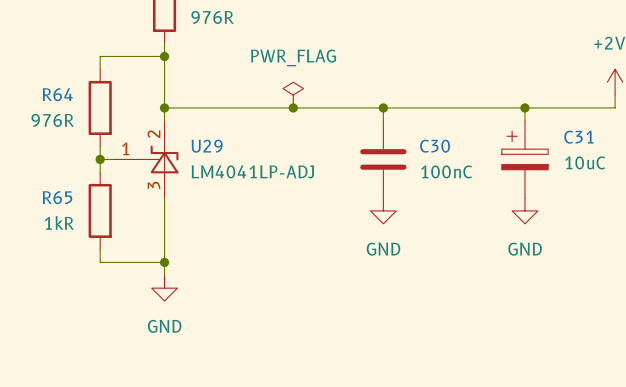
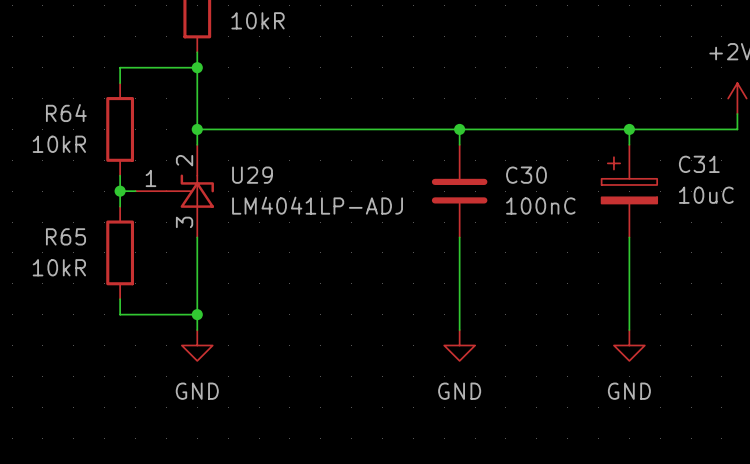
part value: 976R (212, 17) -> 10kR (258, 20)
power symbol: PWR_FLAG (293, 95) -> none
junction: (293, 107) -> none
R64 value: 976R (52, 120) -> 10kR (59, 144)
wire: none -> (459, 237) (459, 330)
wire: none -> (629, 237) (629, 330)
power symbol position: GND (383, 210) -> GND (459, 345)
power symbol position: GND (524, 210) -> GND (629, 345)
R65 value: 1kR (59, 222) -> 10kR (59, 267)

